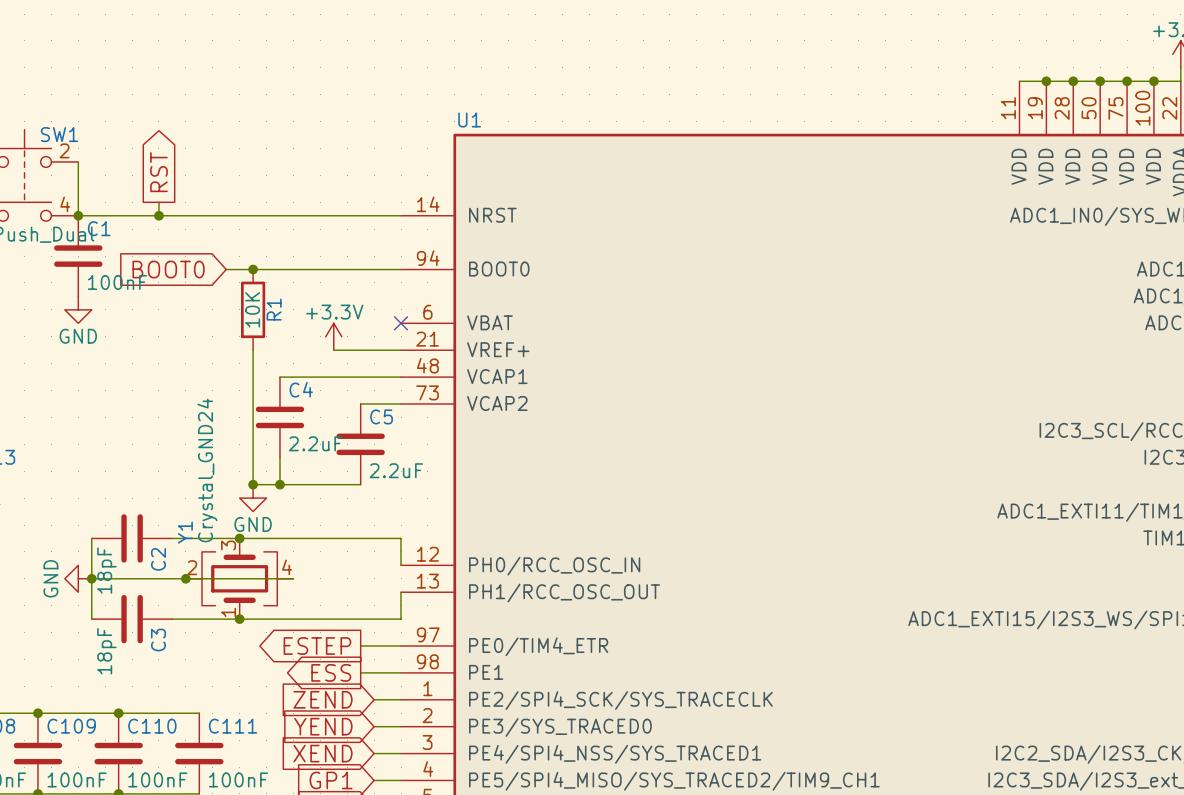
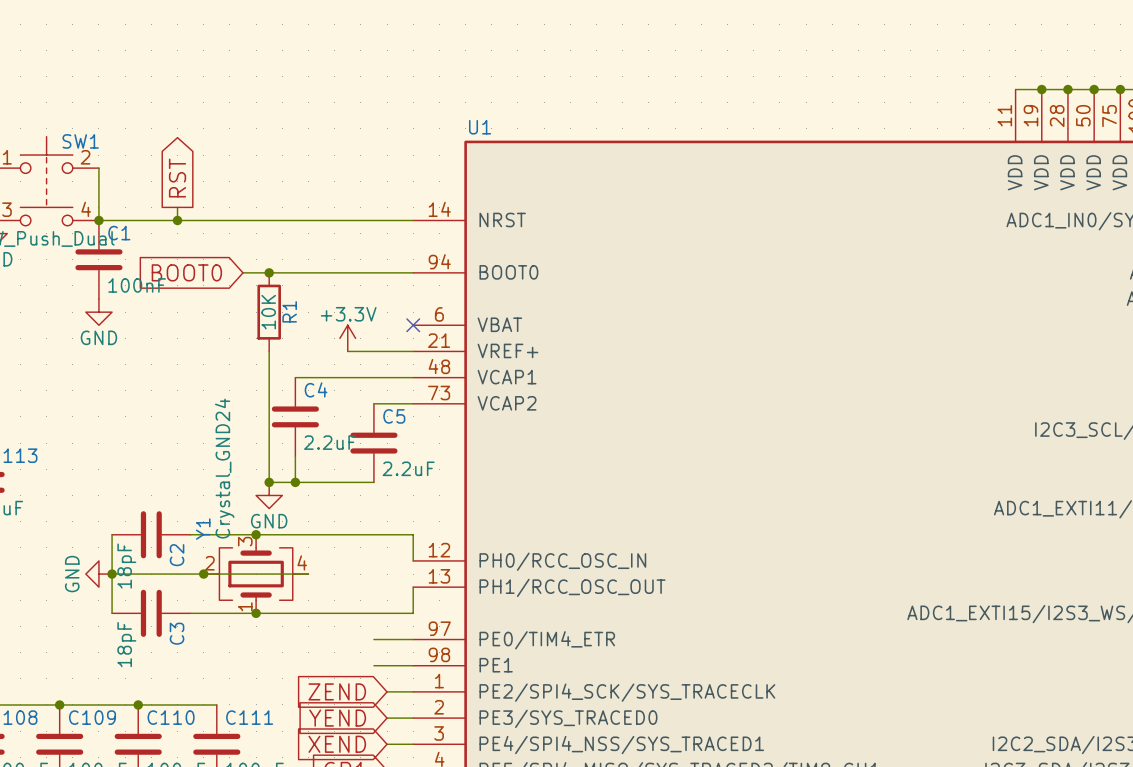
global label: ESTEP (317, 646) -> none
global label: ESS (331, 672) -> none

